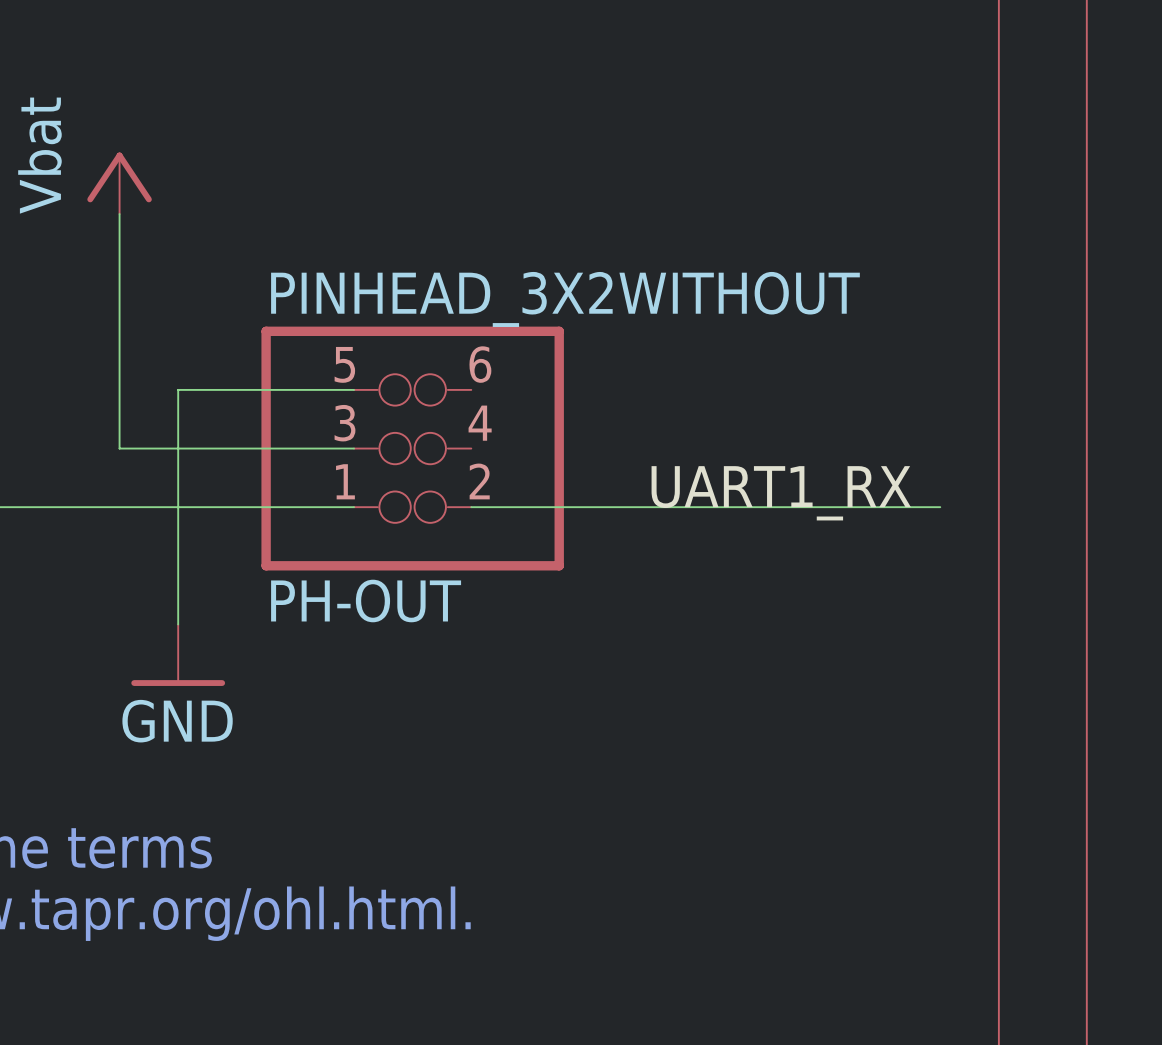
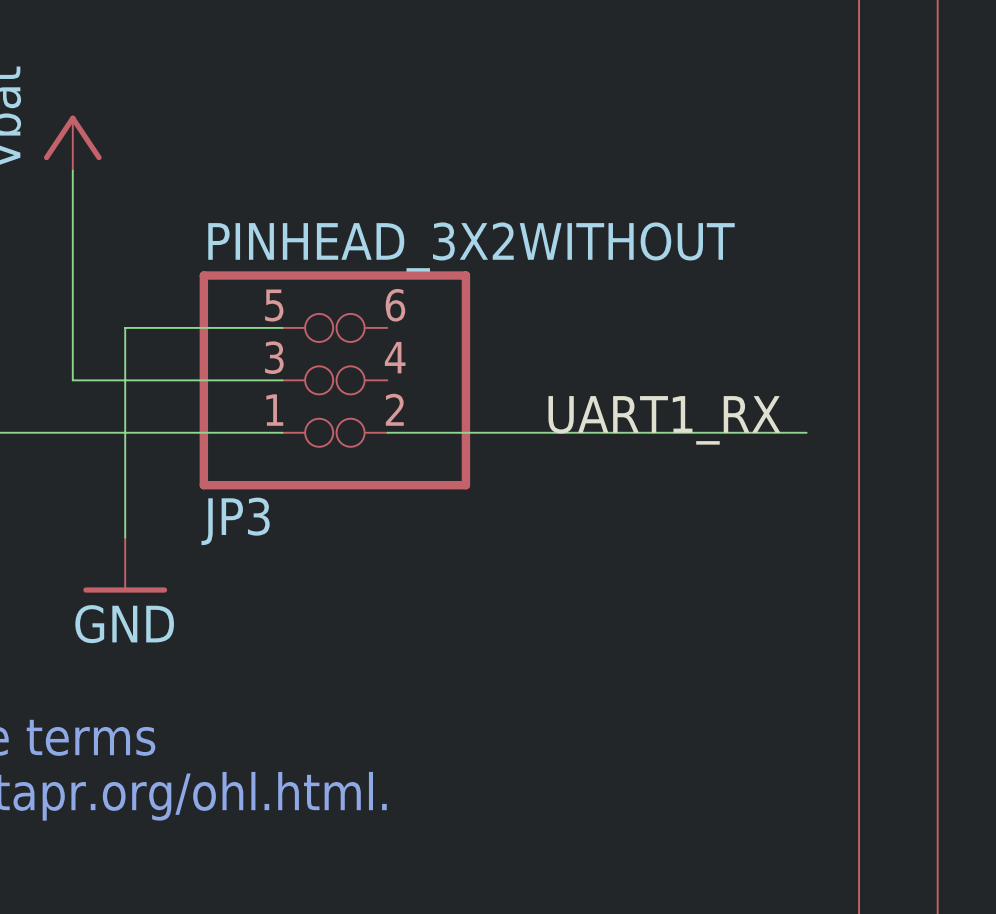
PH-OUT name: PH-OUT (366, 600) -> JP3 (235, 521)

